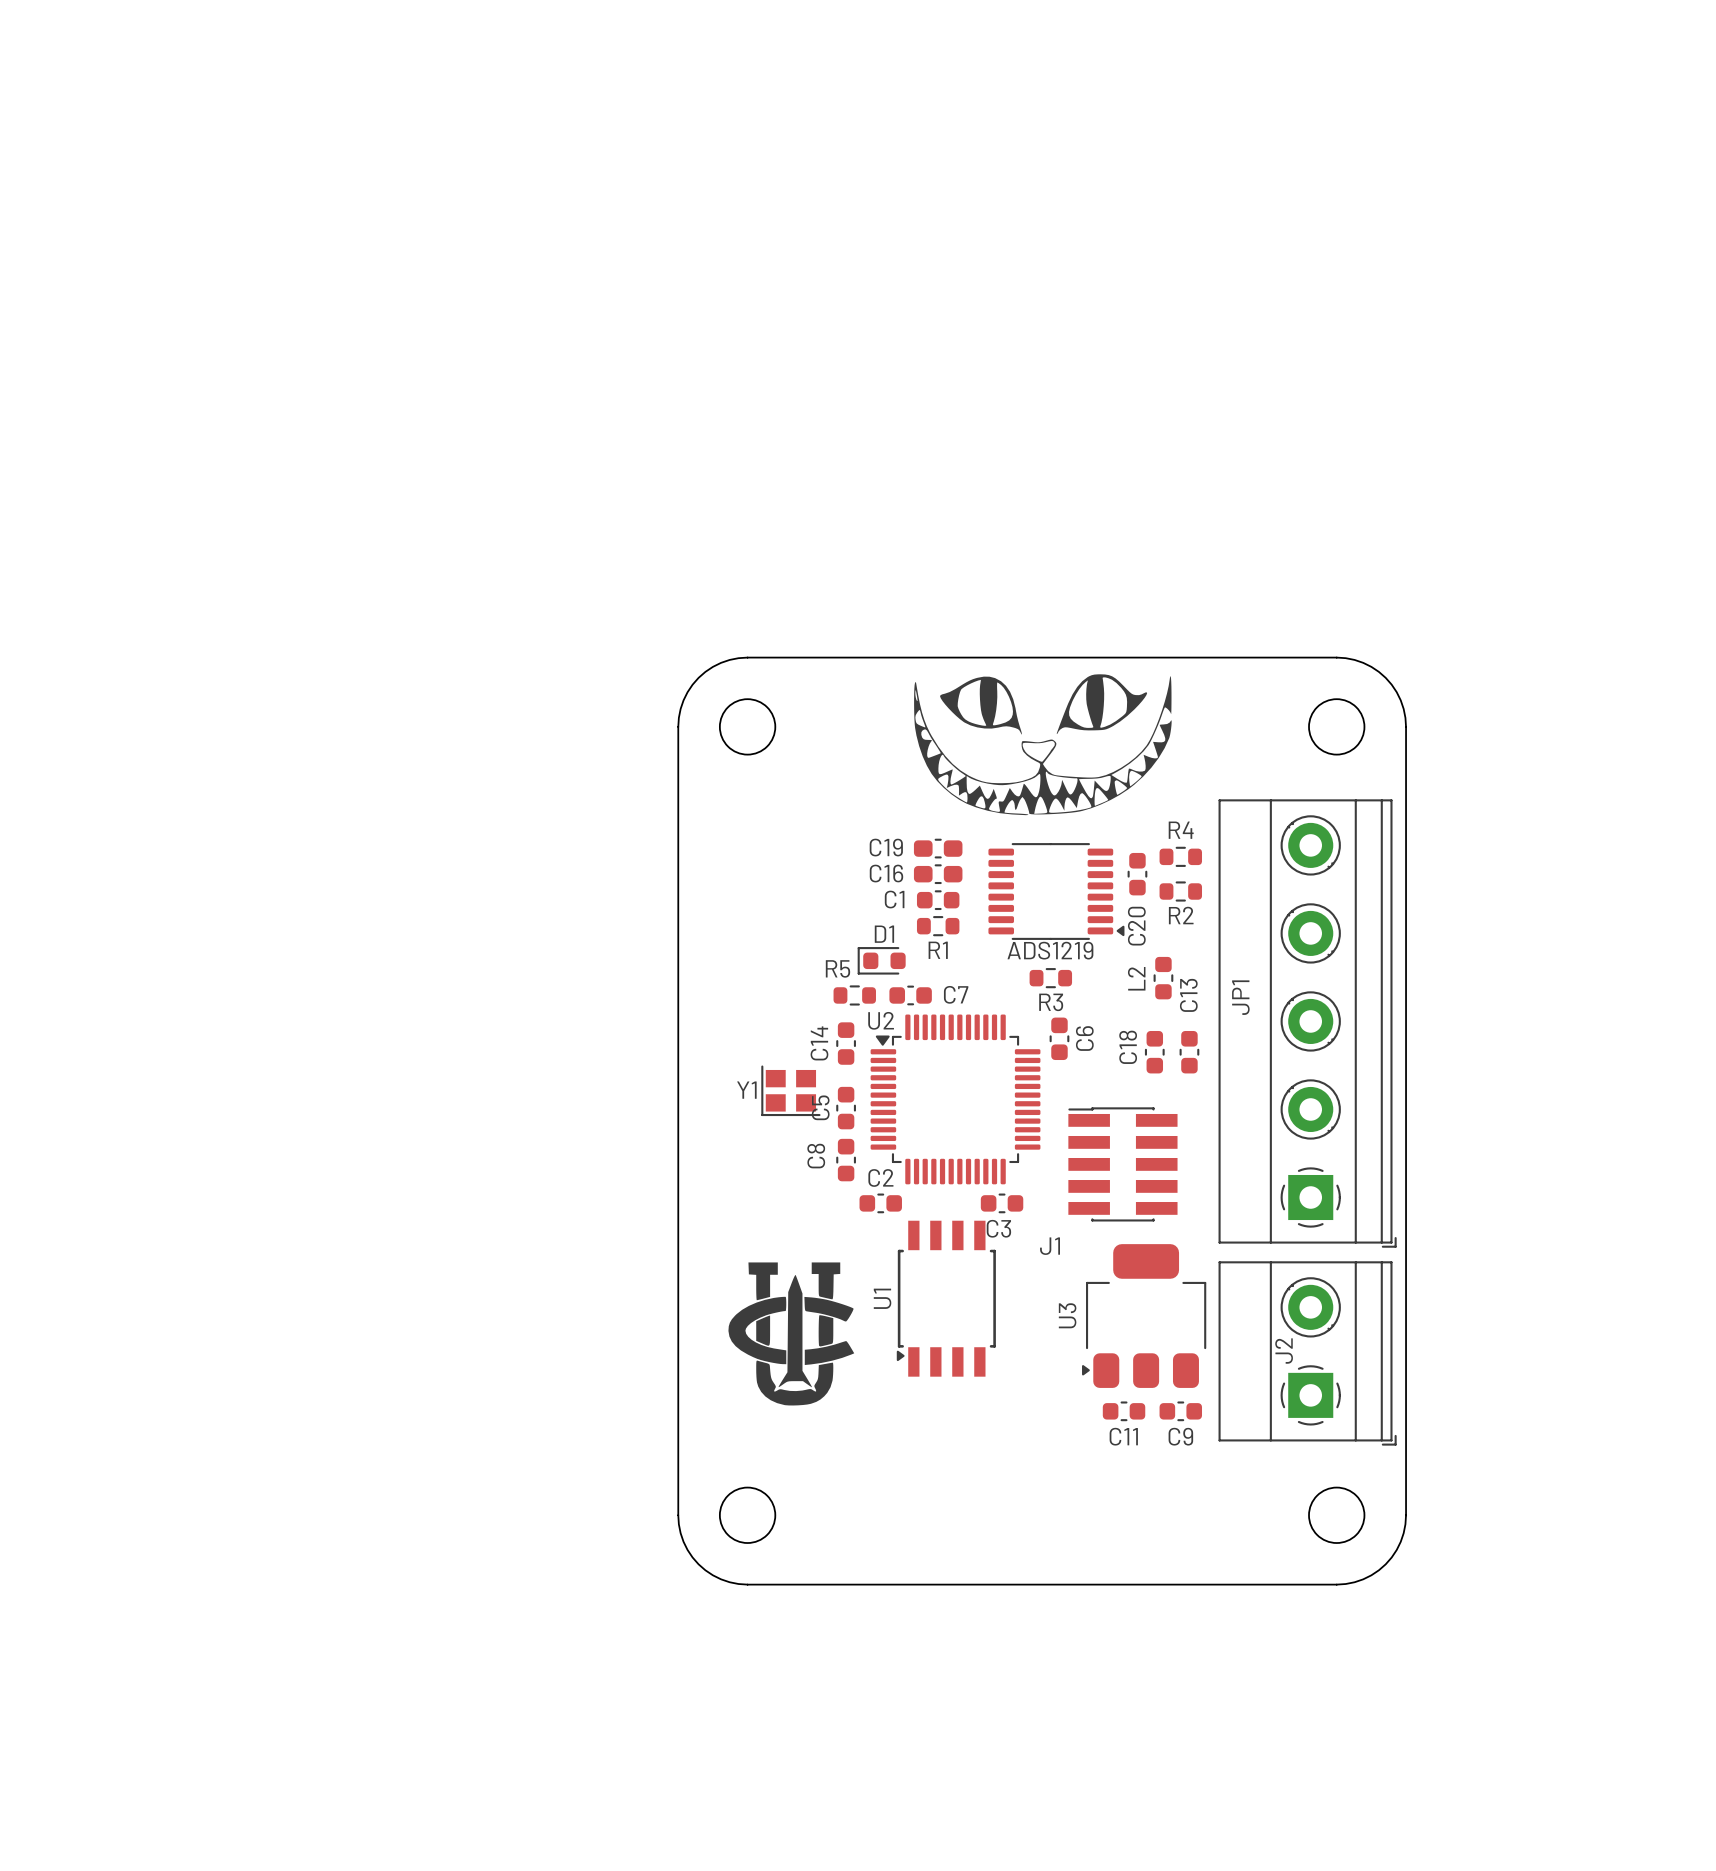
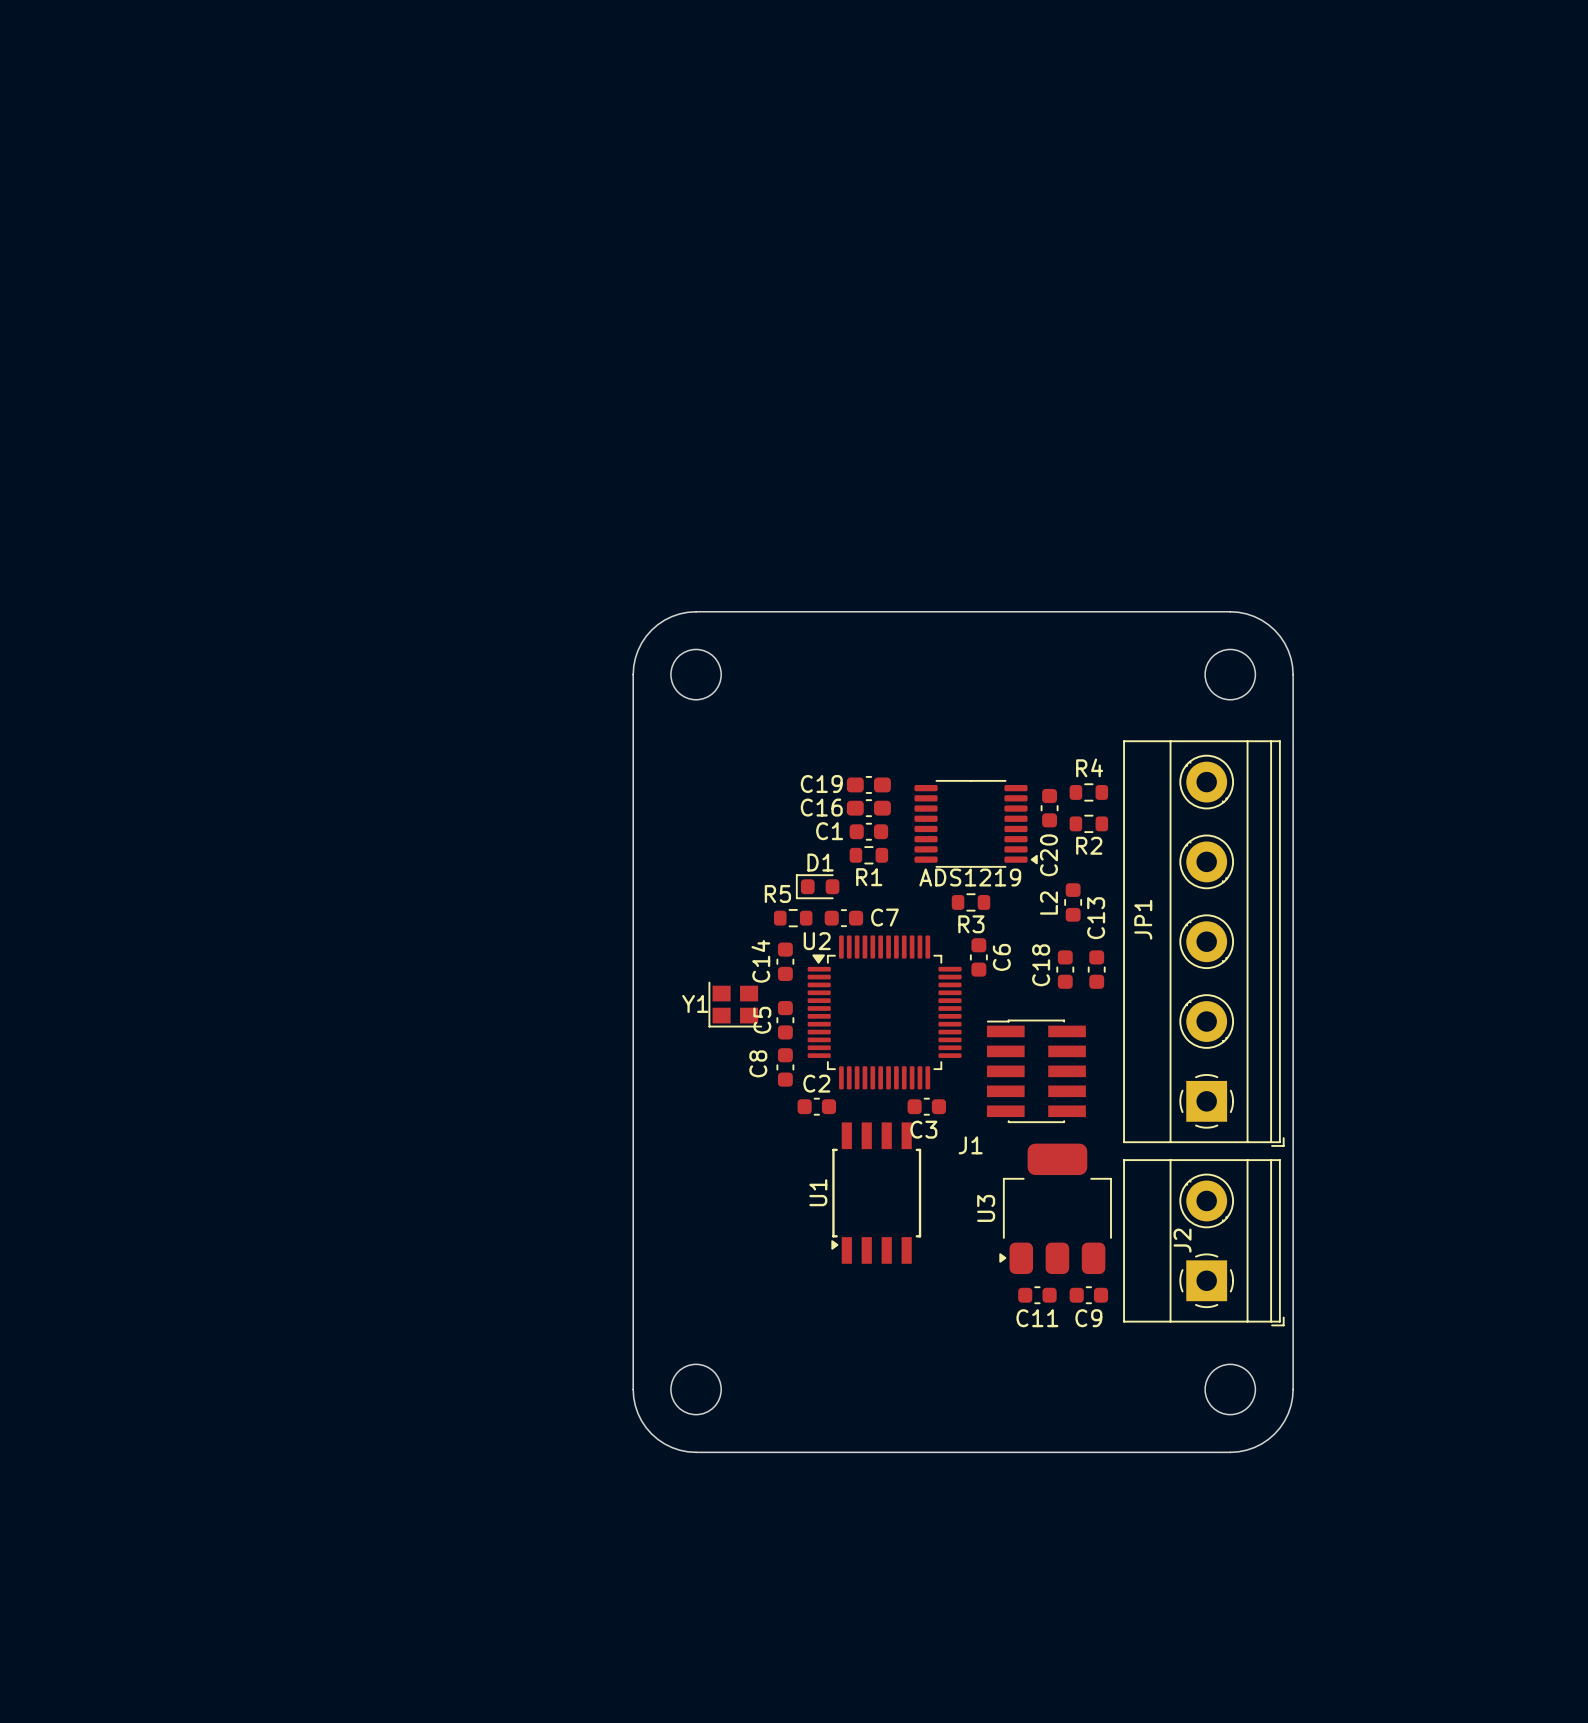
drawing: [914, 674, 1172, 816] -> none
drawing: [728, 1262, 855, 1406] -> none

